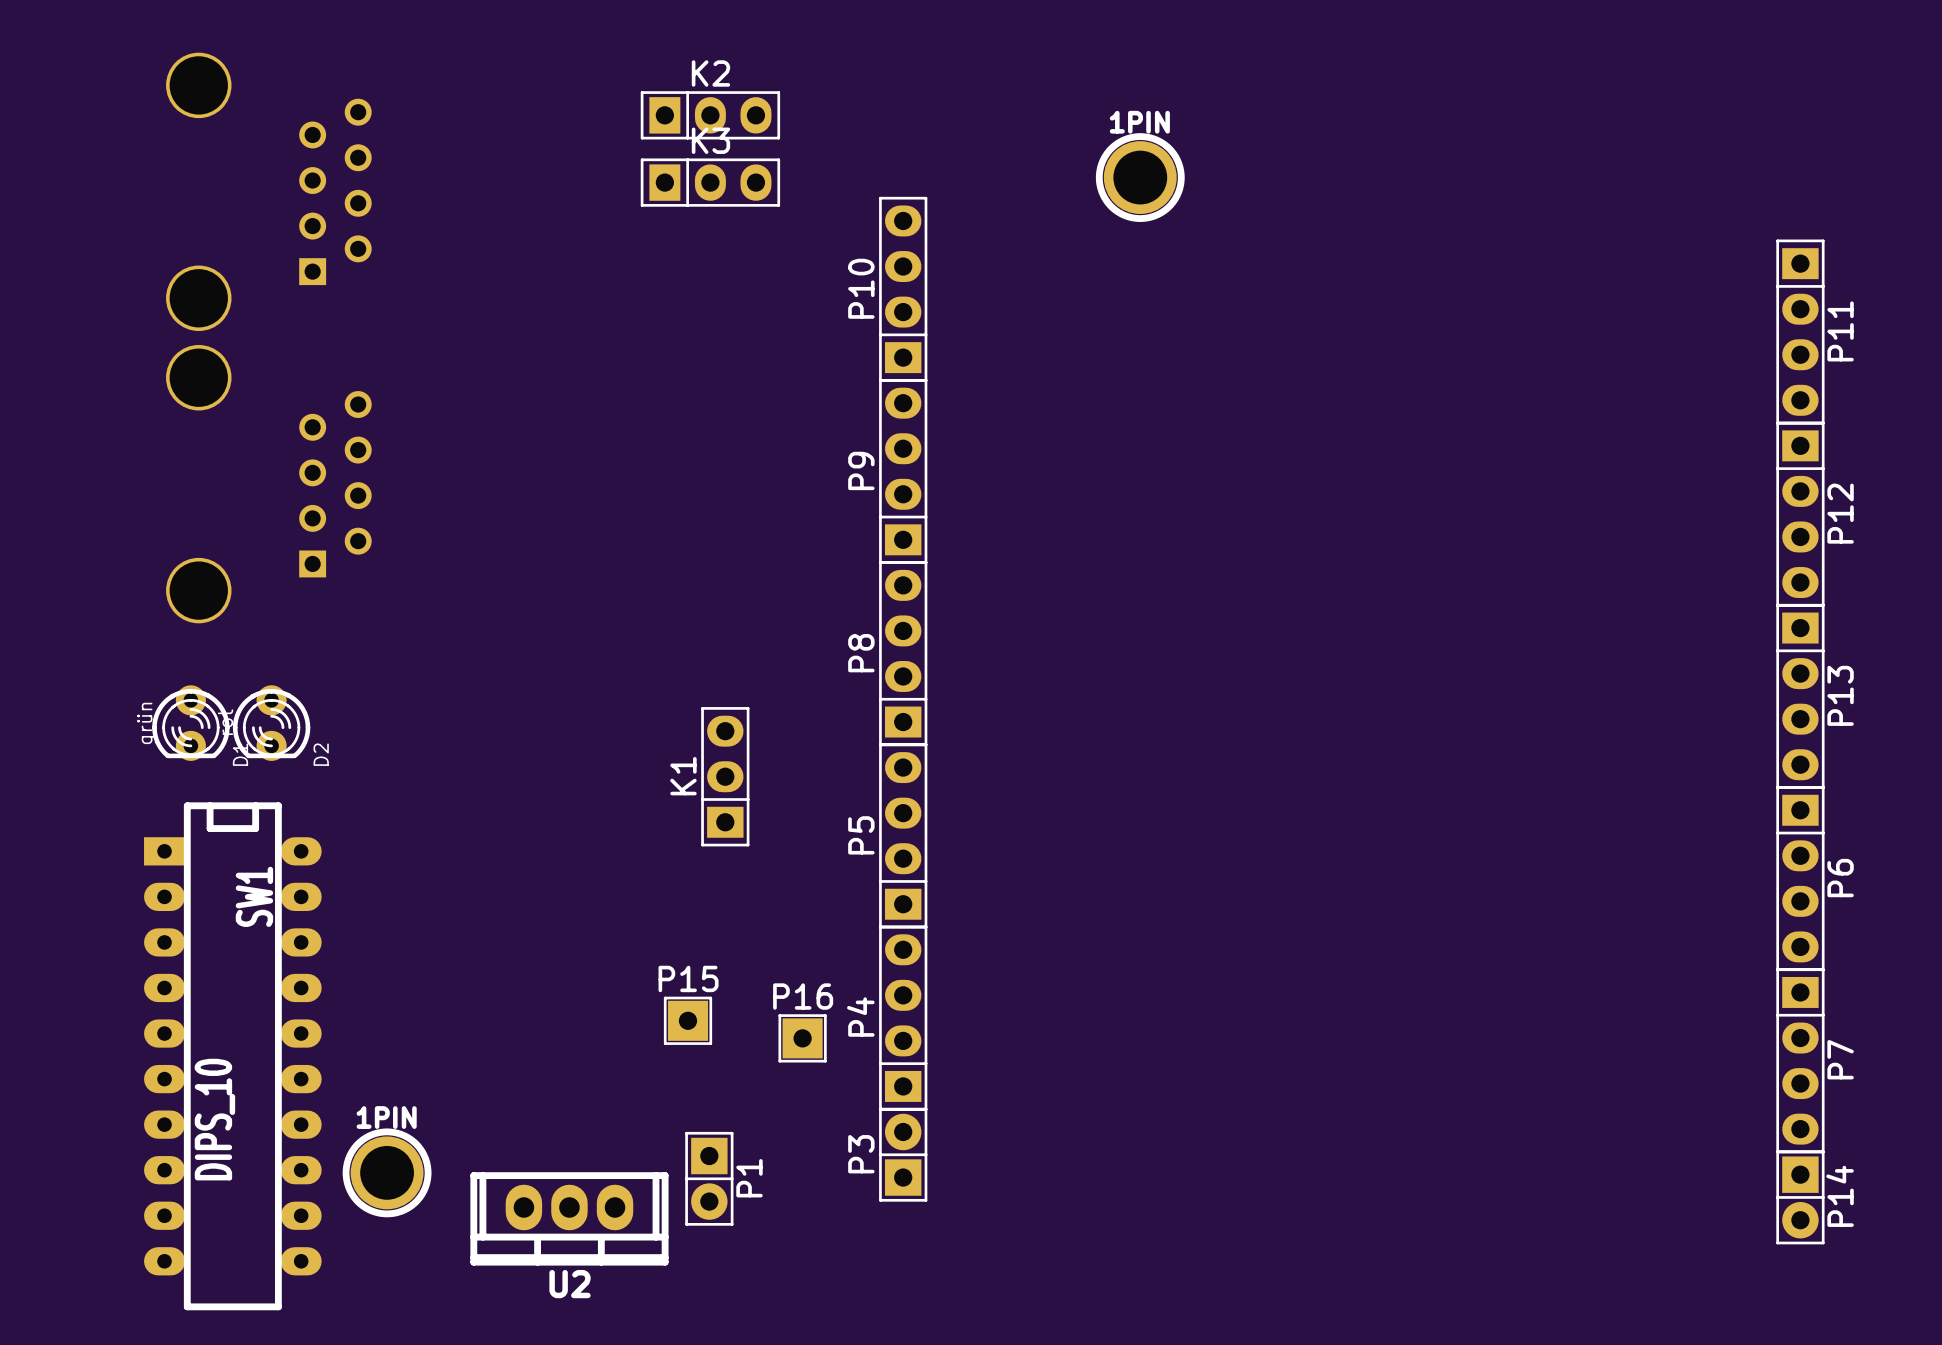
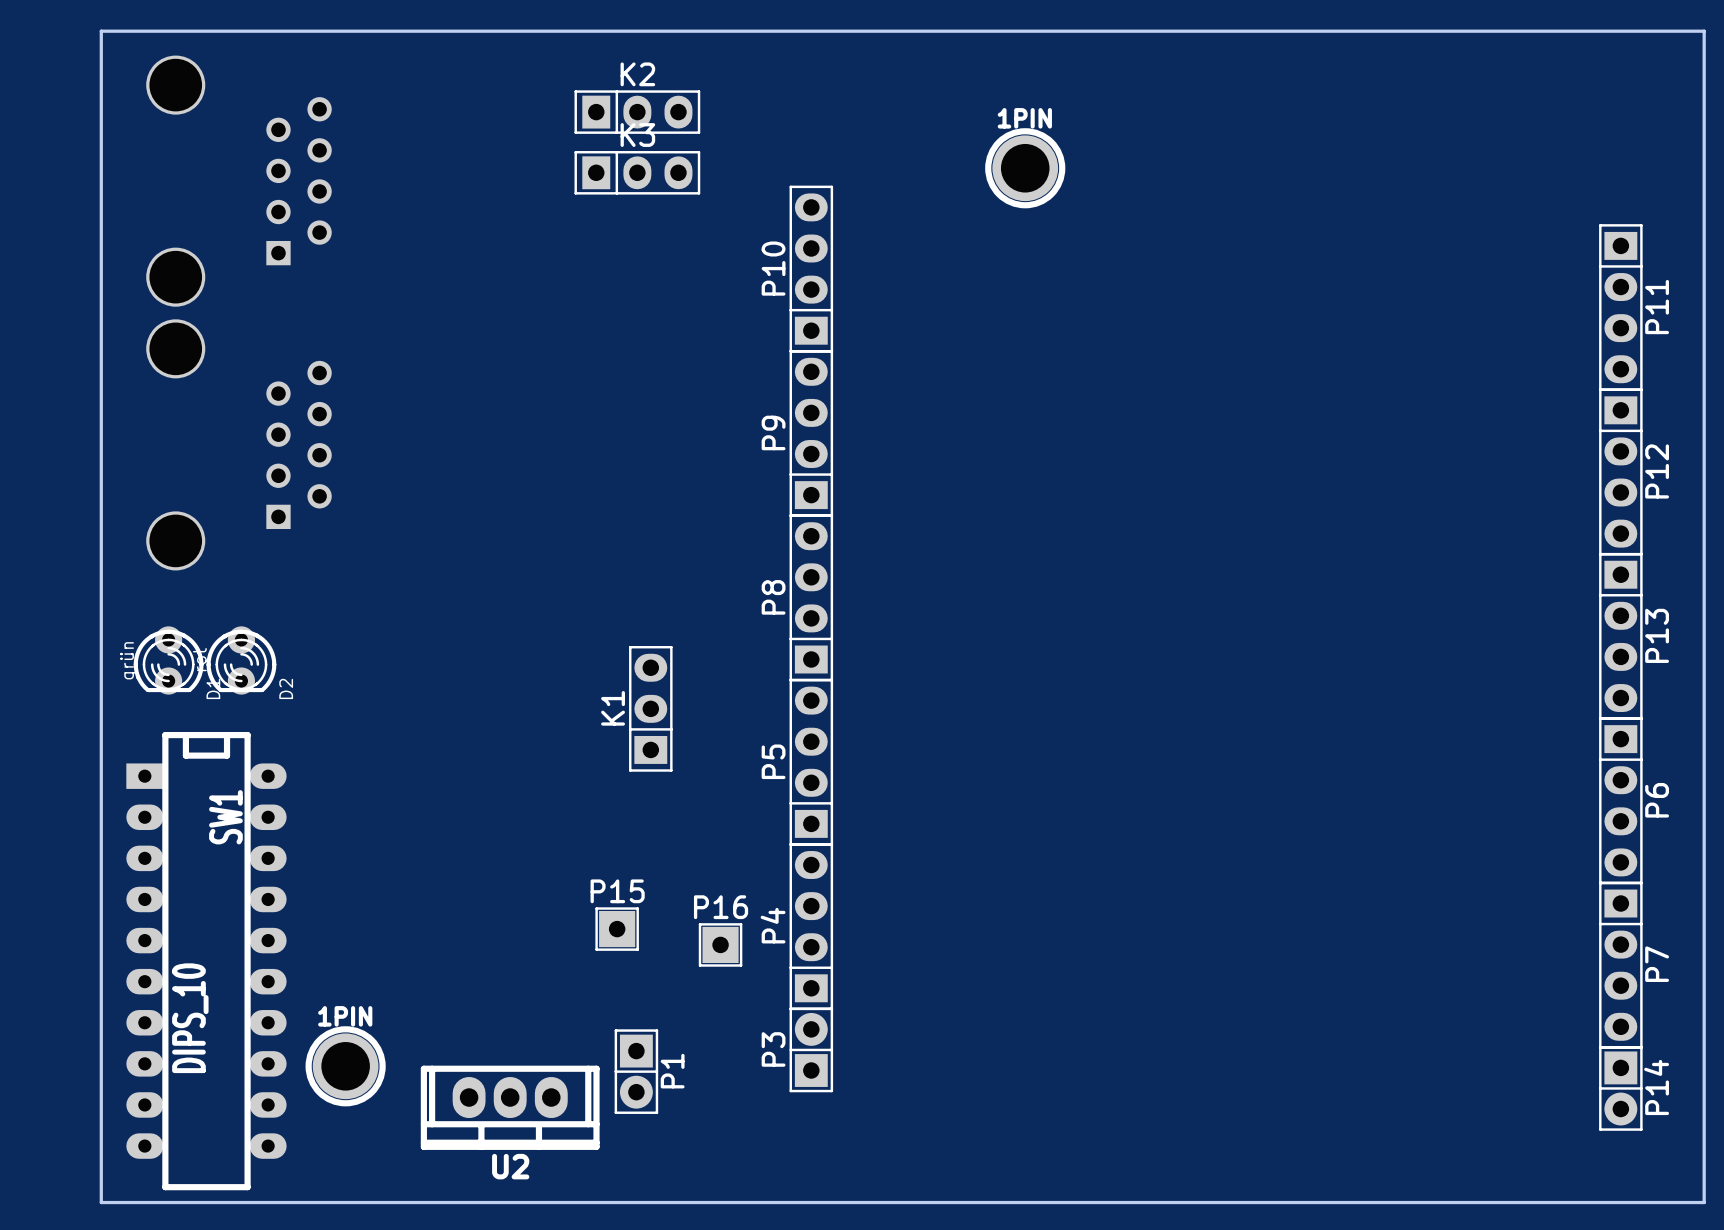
board edge: none -> (101, 31) (1704, 31) (1704, 1202) (101, 1202) (101, 31)

